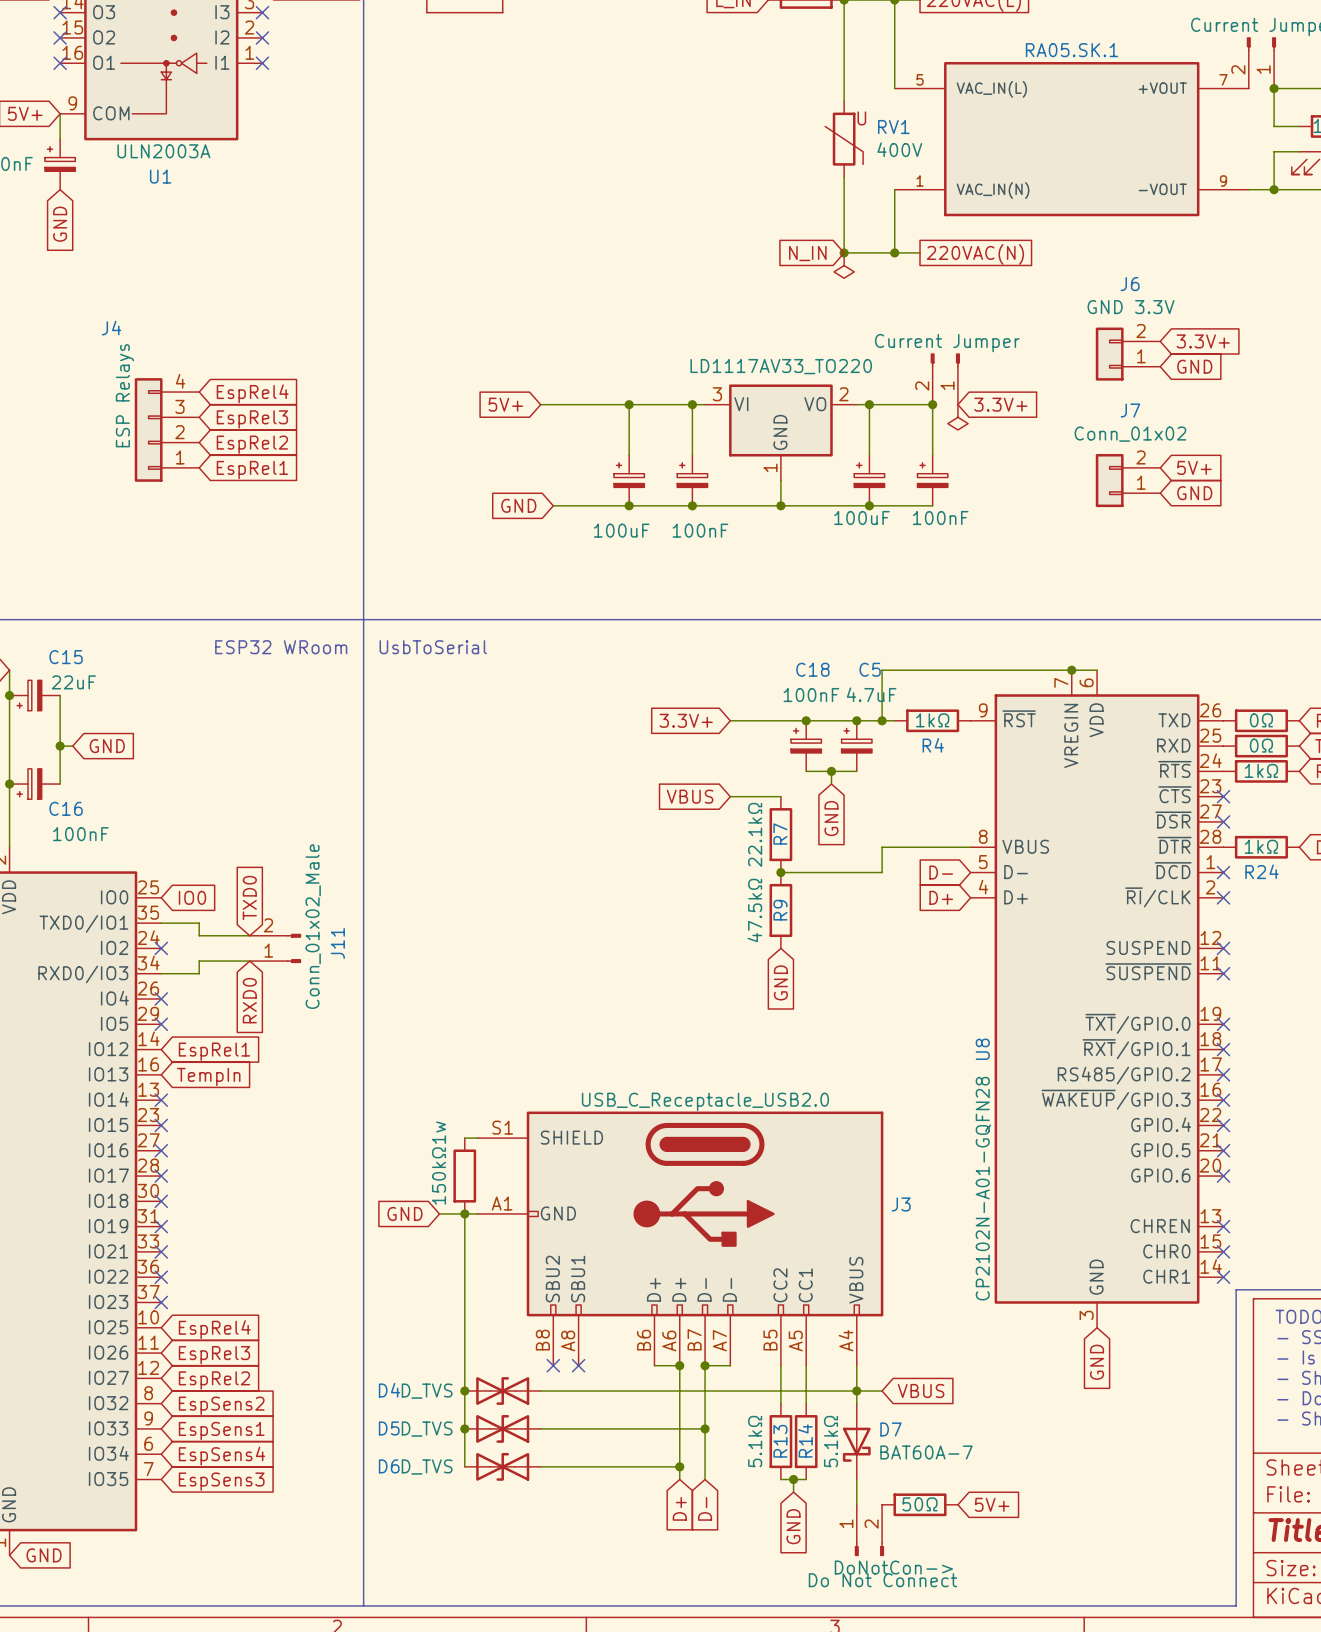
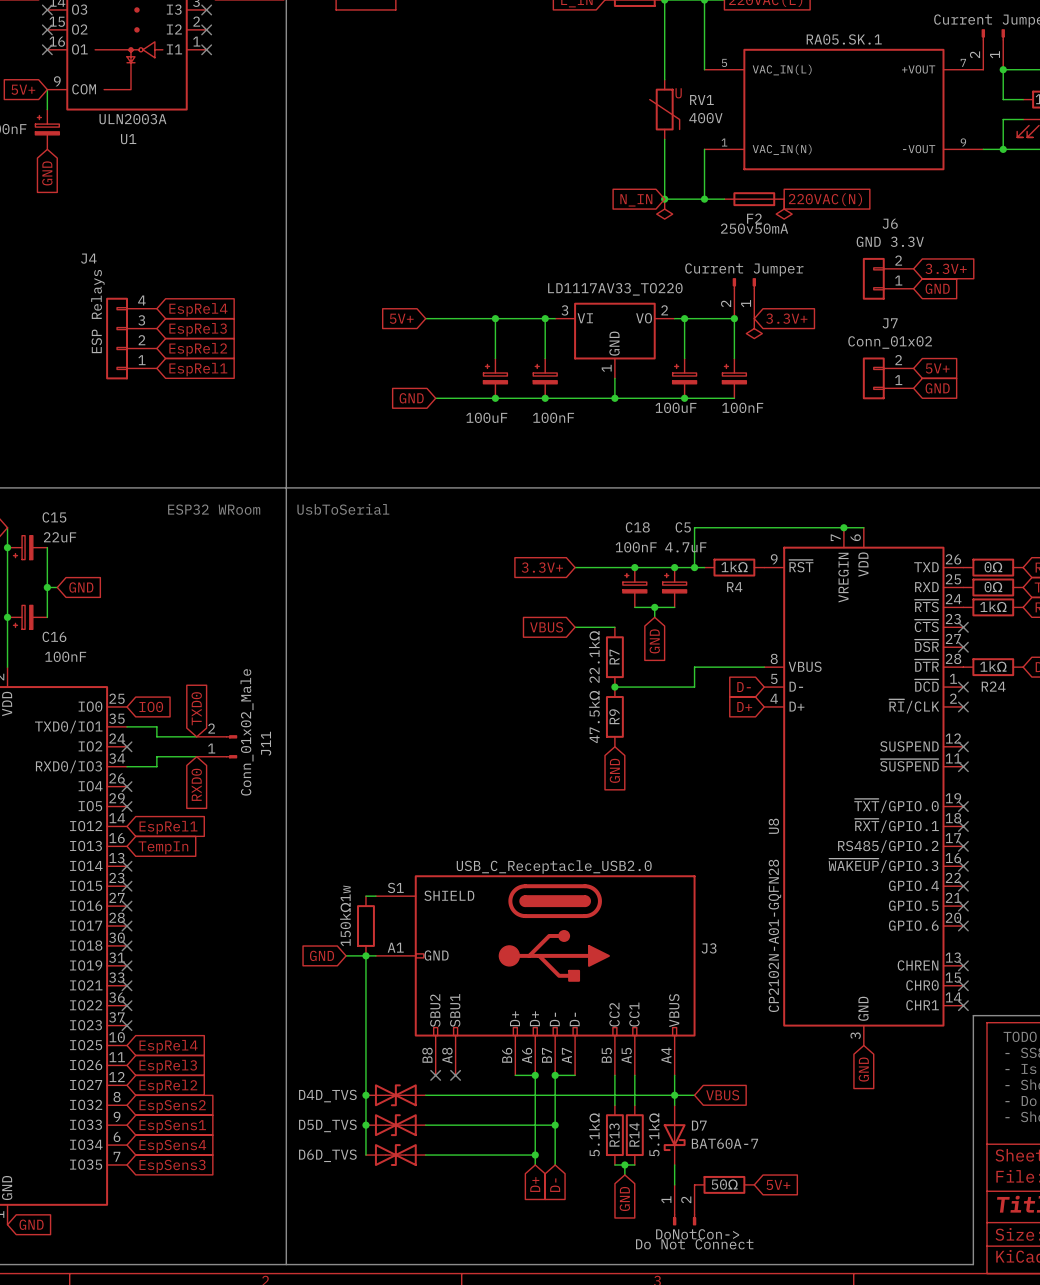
F2: none -> 250v50mA (754, 199)
global label position: 220VAC(N) (975, 254) -> 220VAC(N) (825, 199)
power symbol: none -> (784, 209)

